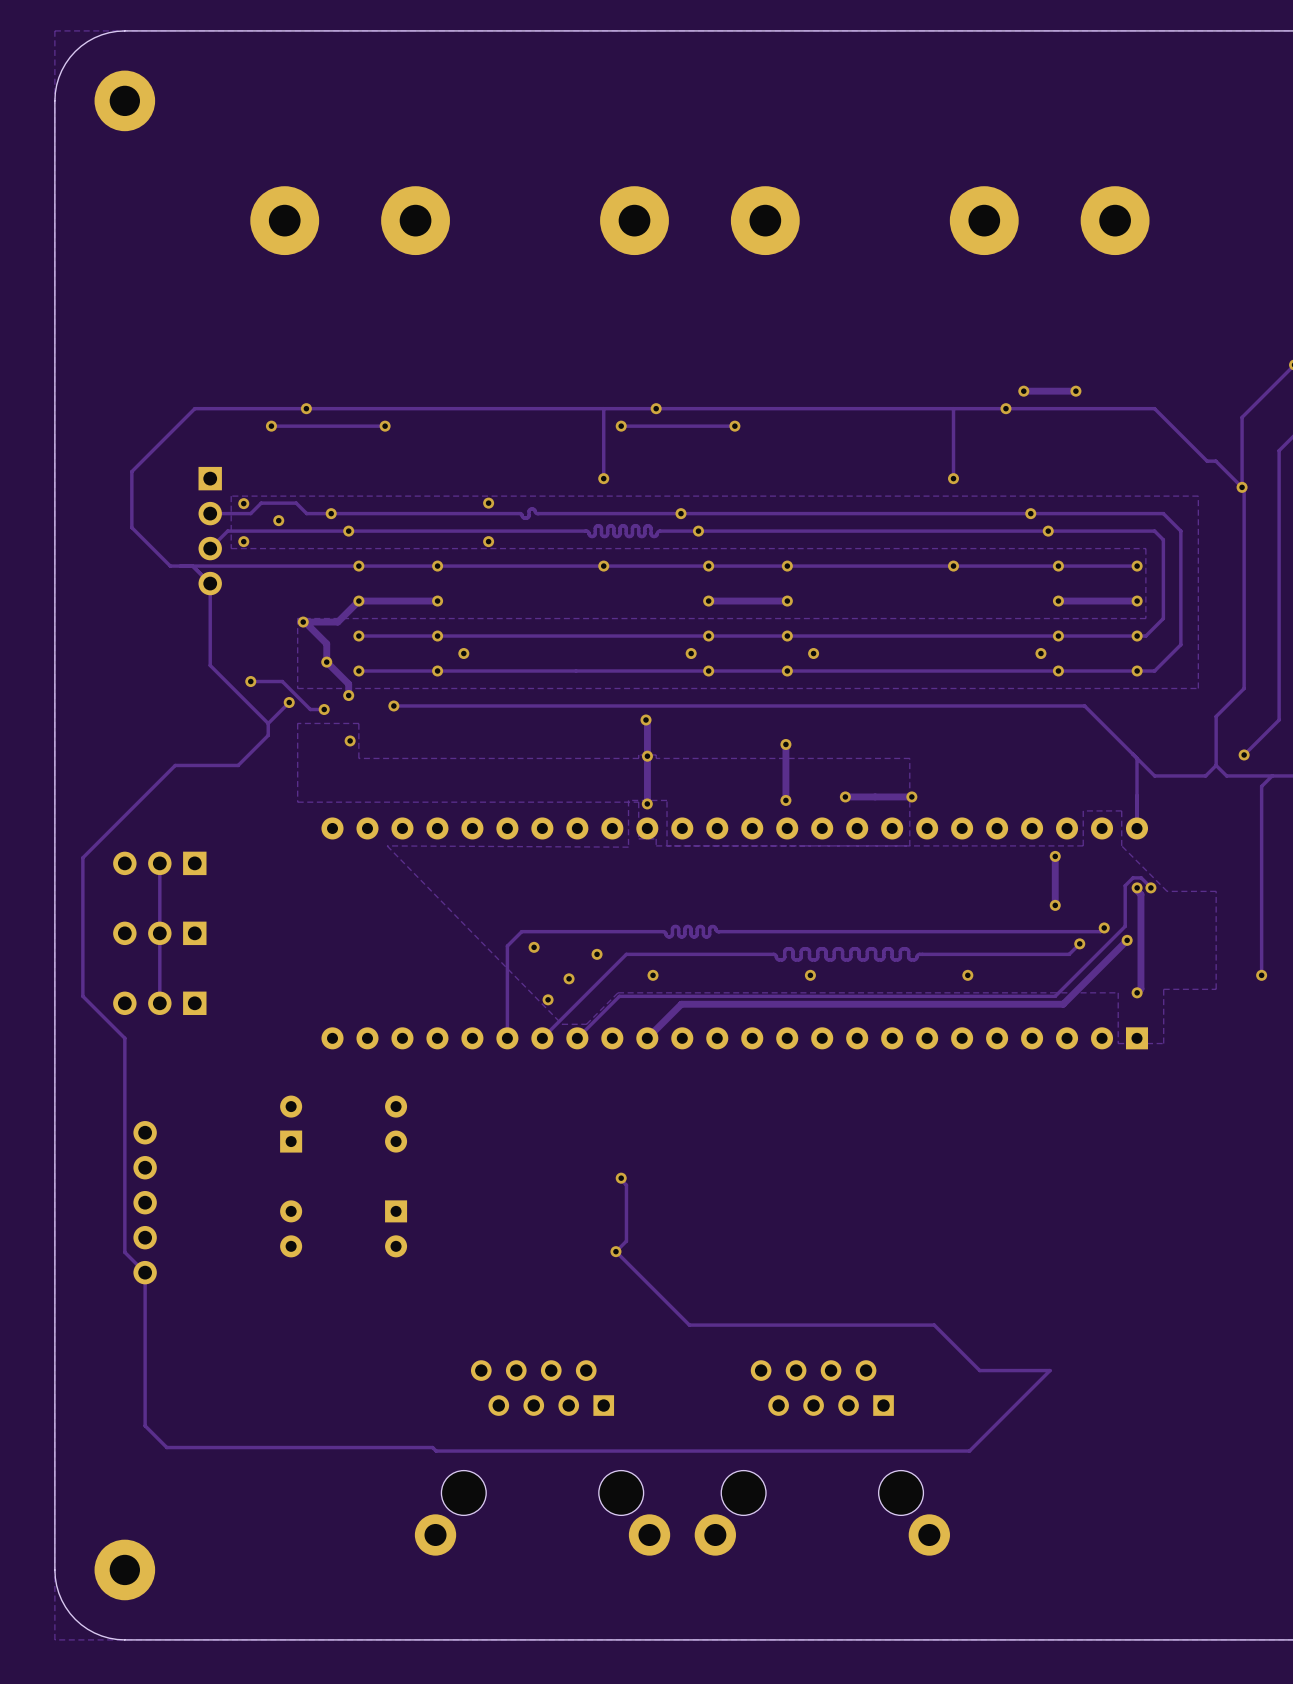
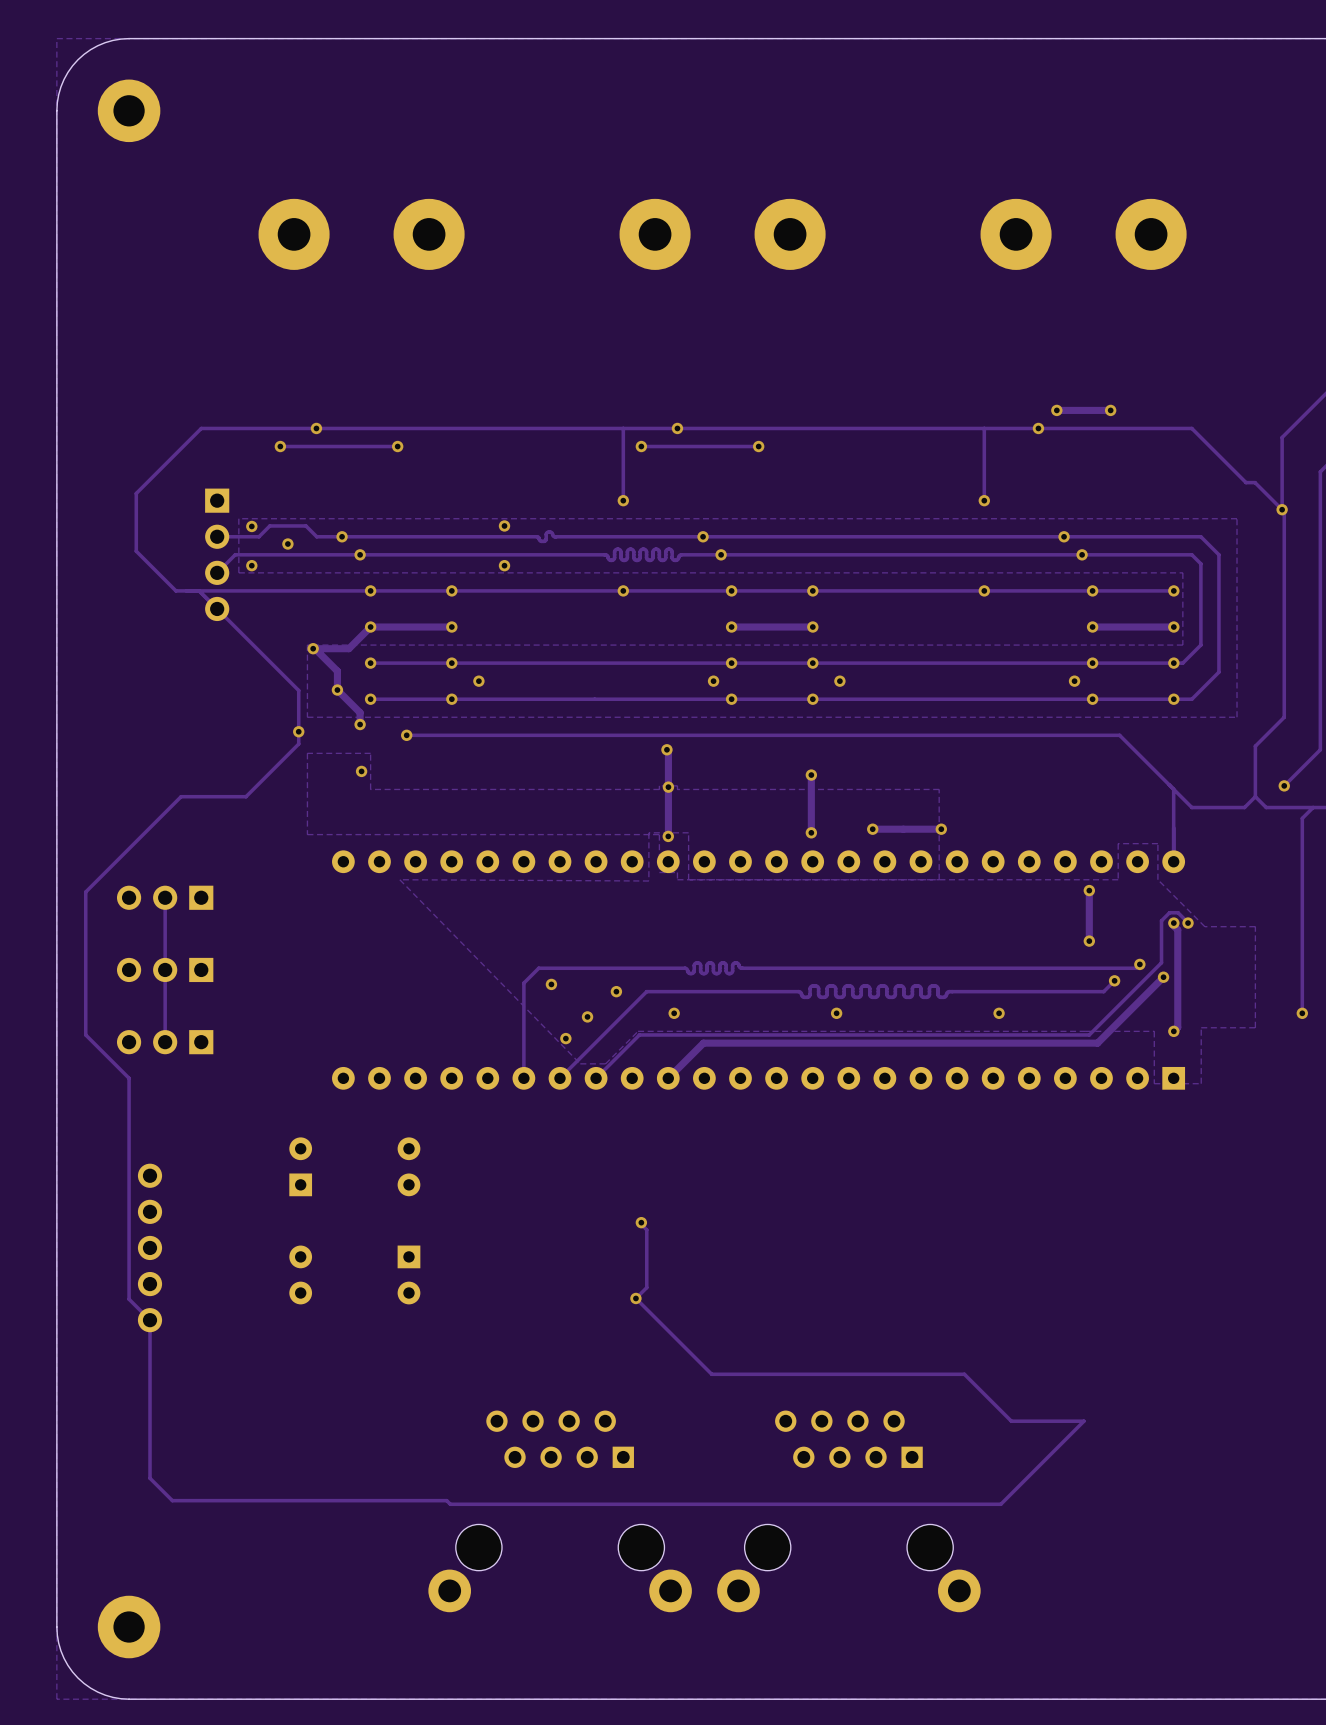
track: (210, 583) (210, 665) (268, 723) -> none
track: (250, 681) (282, 681) (310, 709) (324, 709) -> none
via: (250, 681) -> none
track: (289, 702) (268, 723) -> none
via: (324, 709) -> none
track: (268, 723) (268, 735) -> (222, 614) (298, 690) (298, 744) (277, 765)

